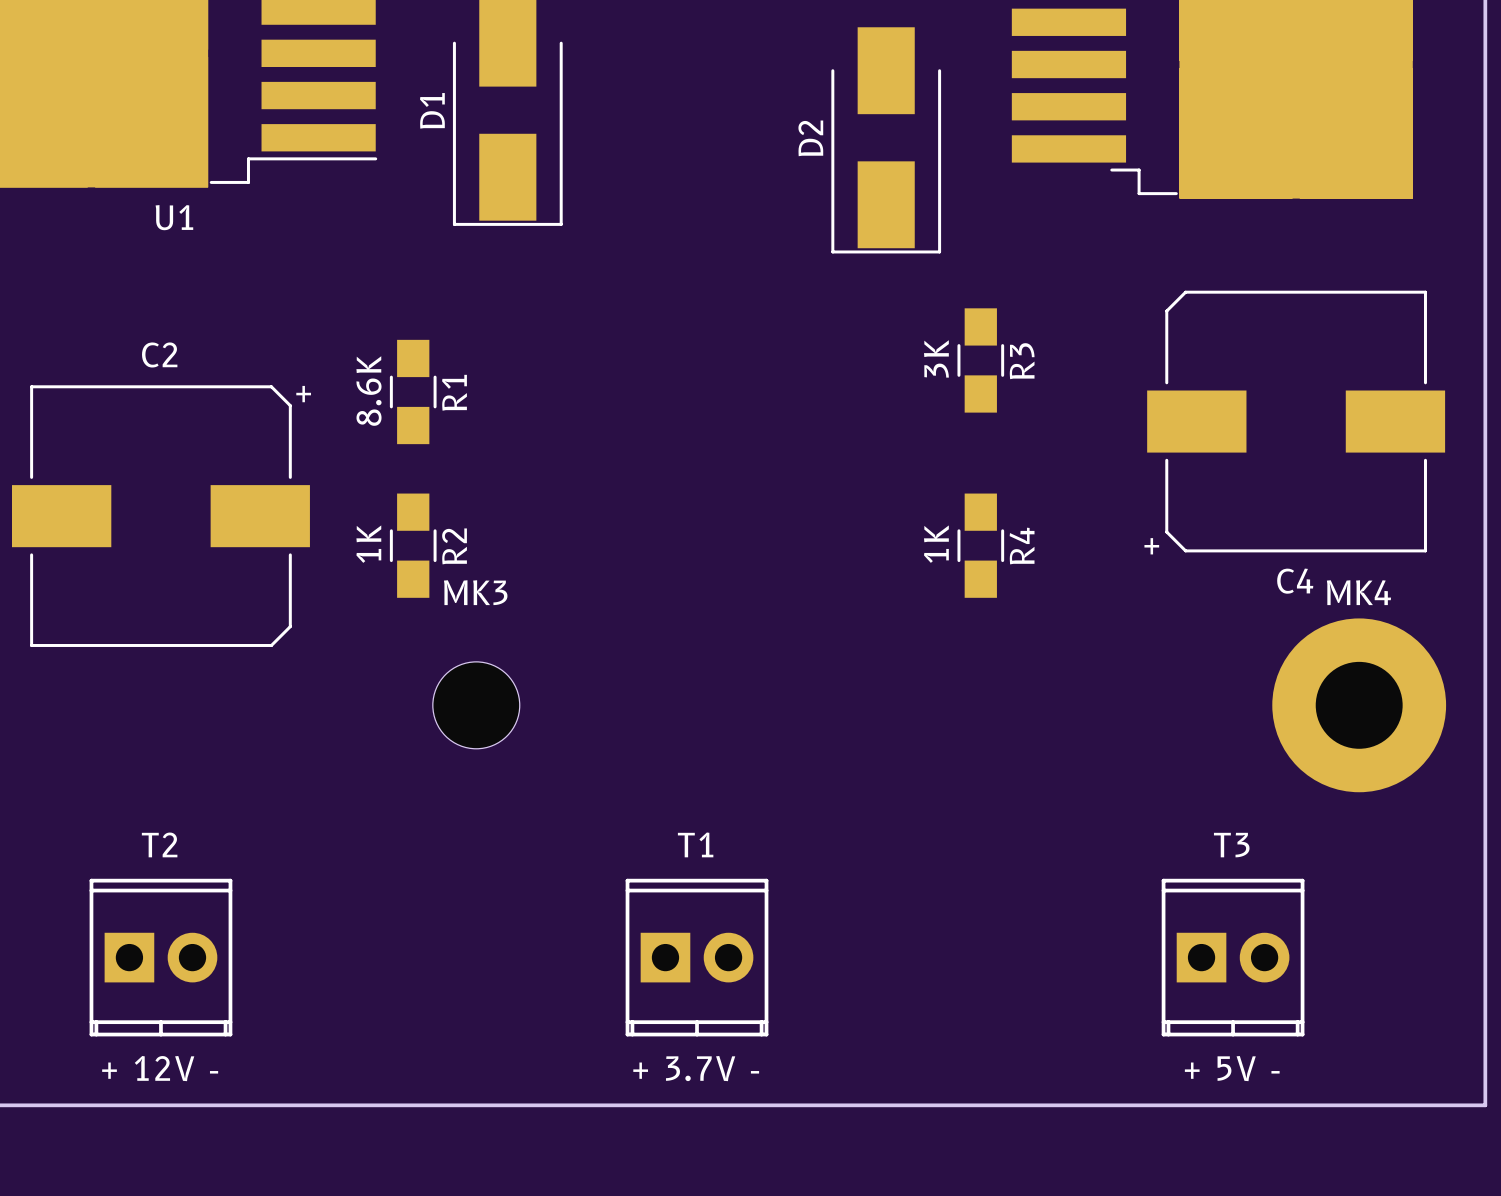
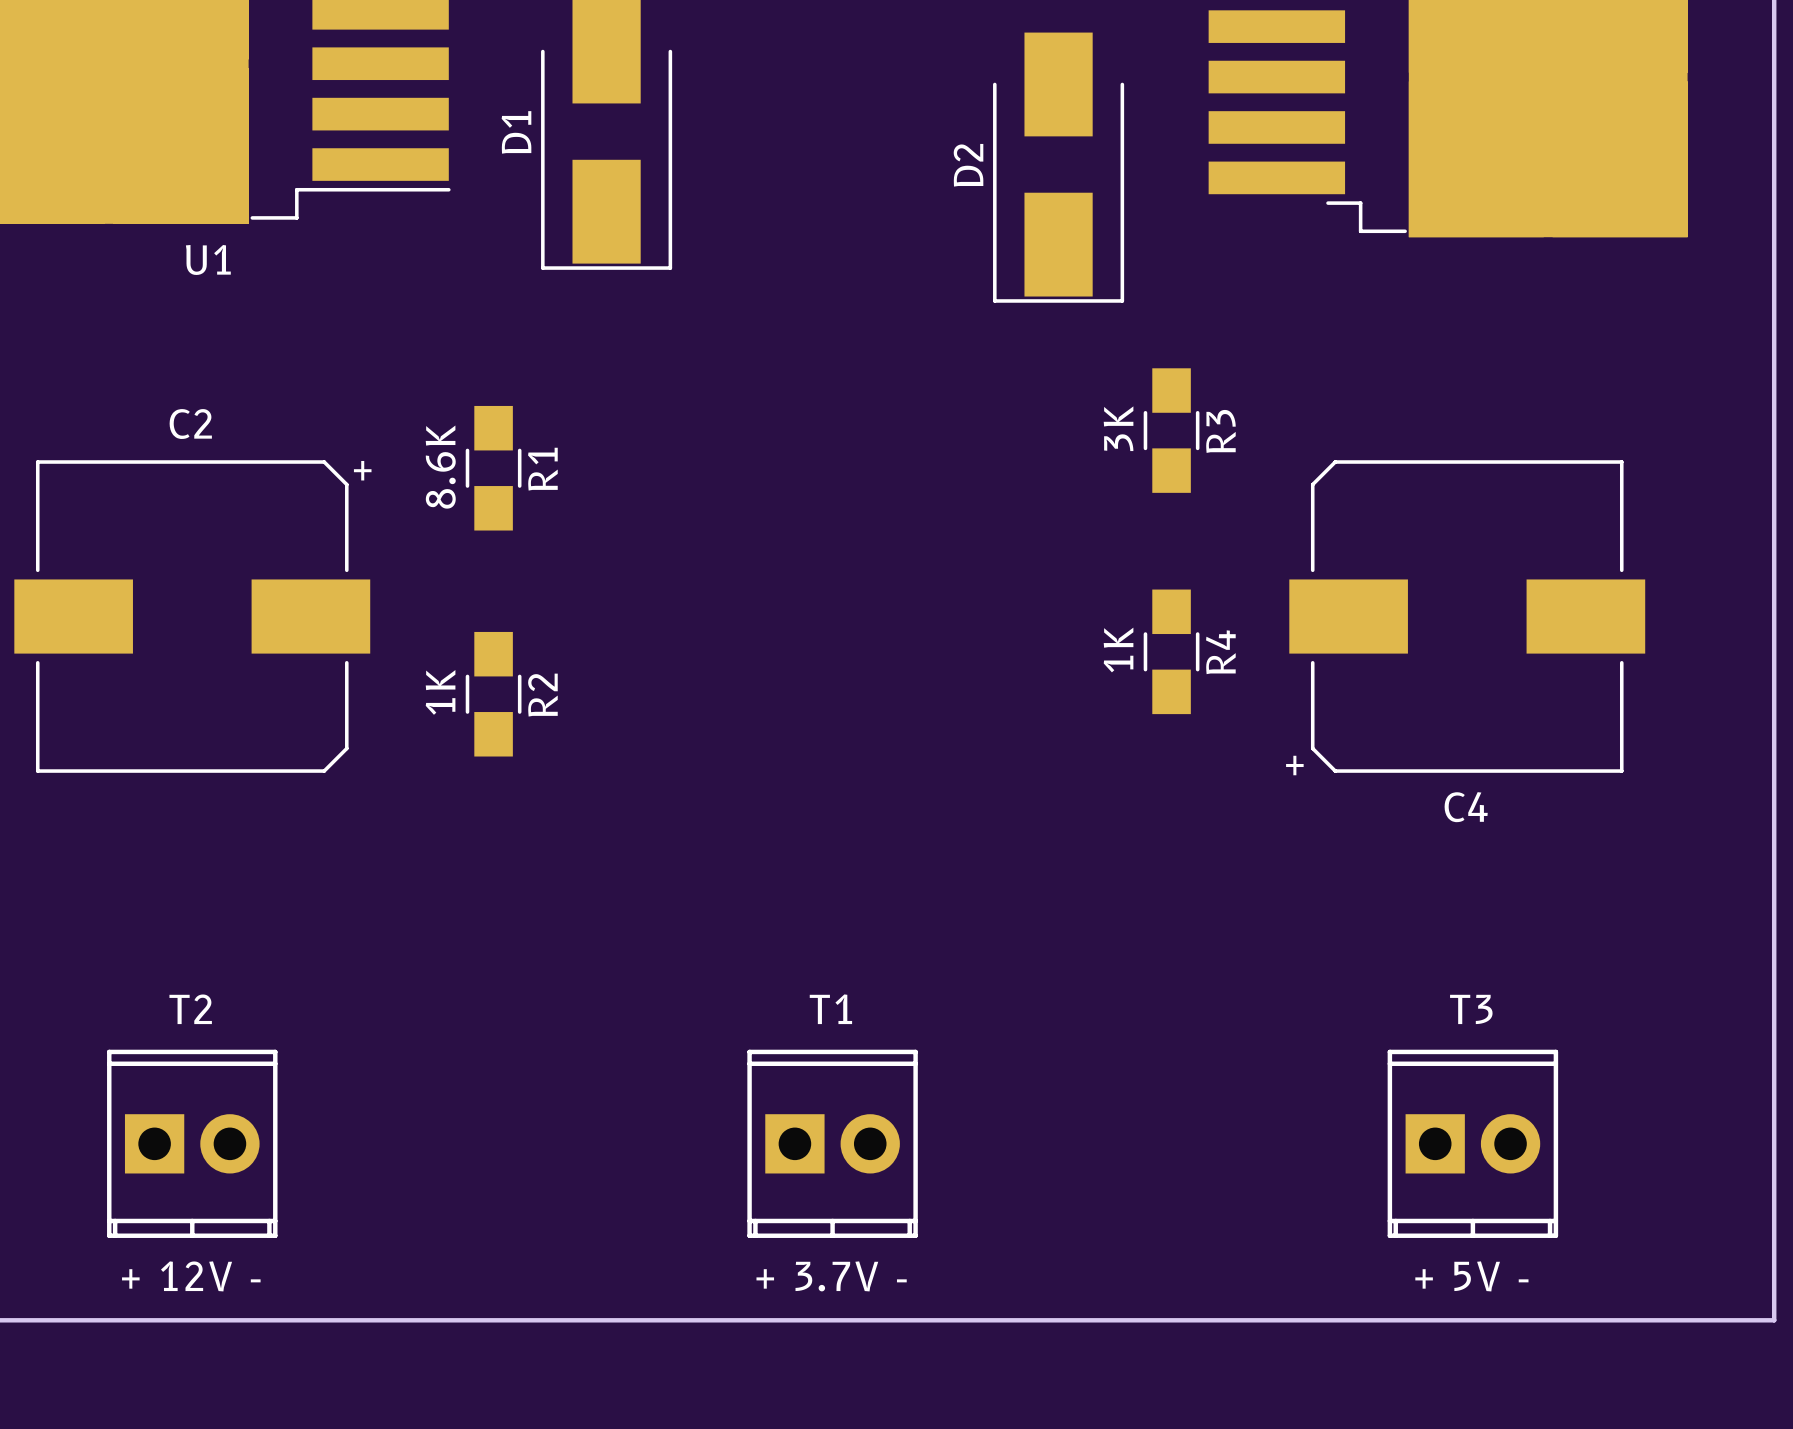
C4 position: (1296, 421) -> (1467, 616)
R2 position: (413, 545) -> (493, 694)
MK3: (476, 705) -> none
MK4: (1359, 705) -> none

